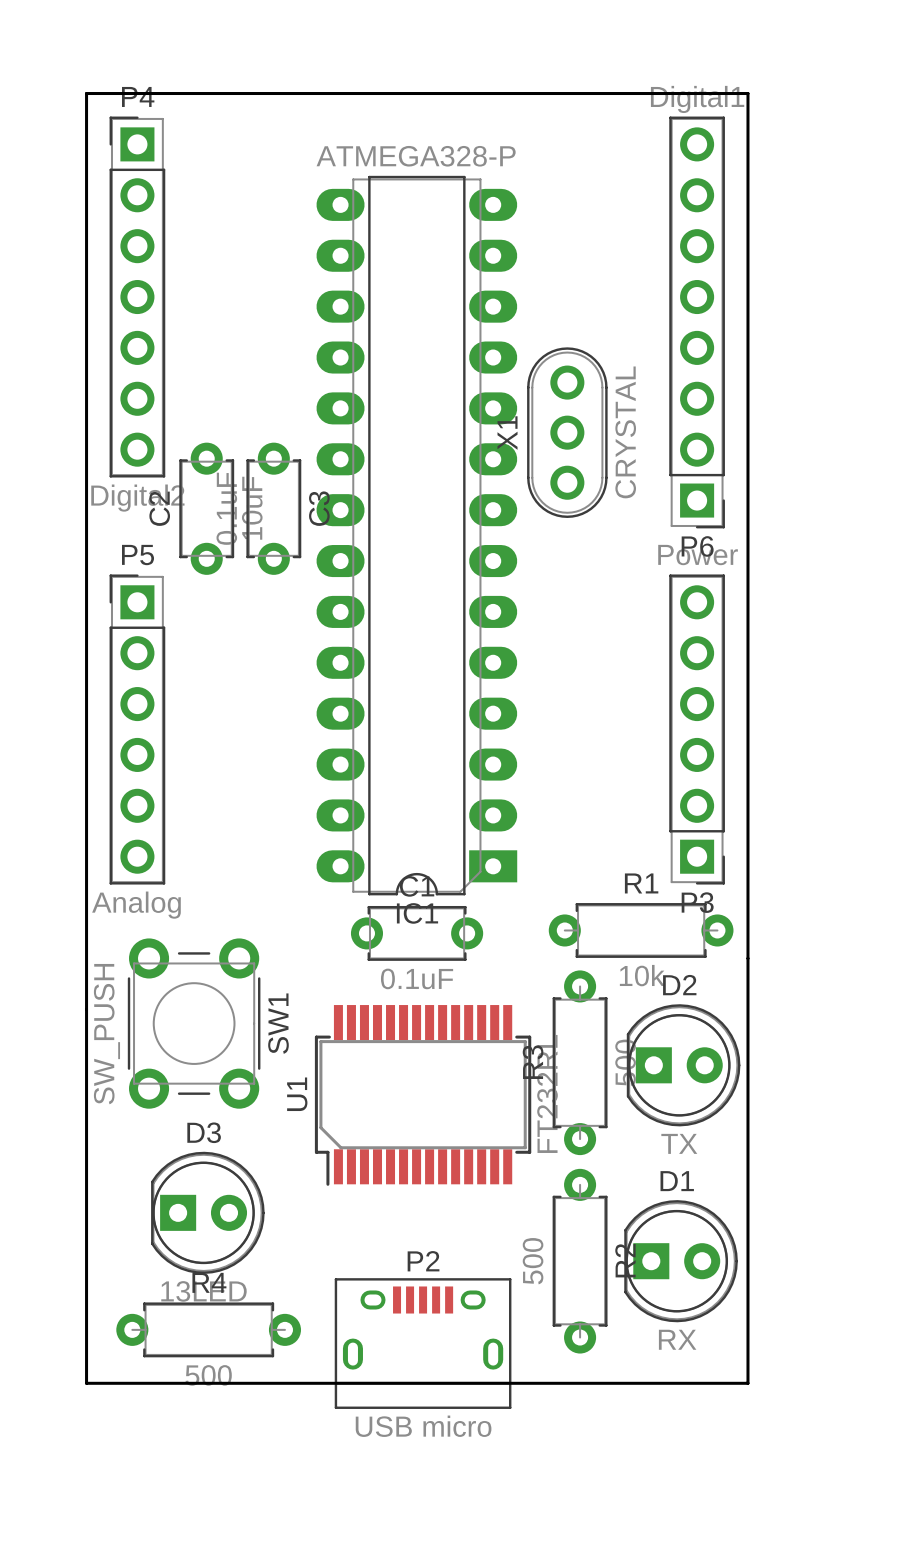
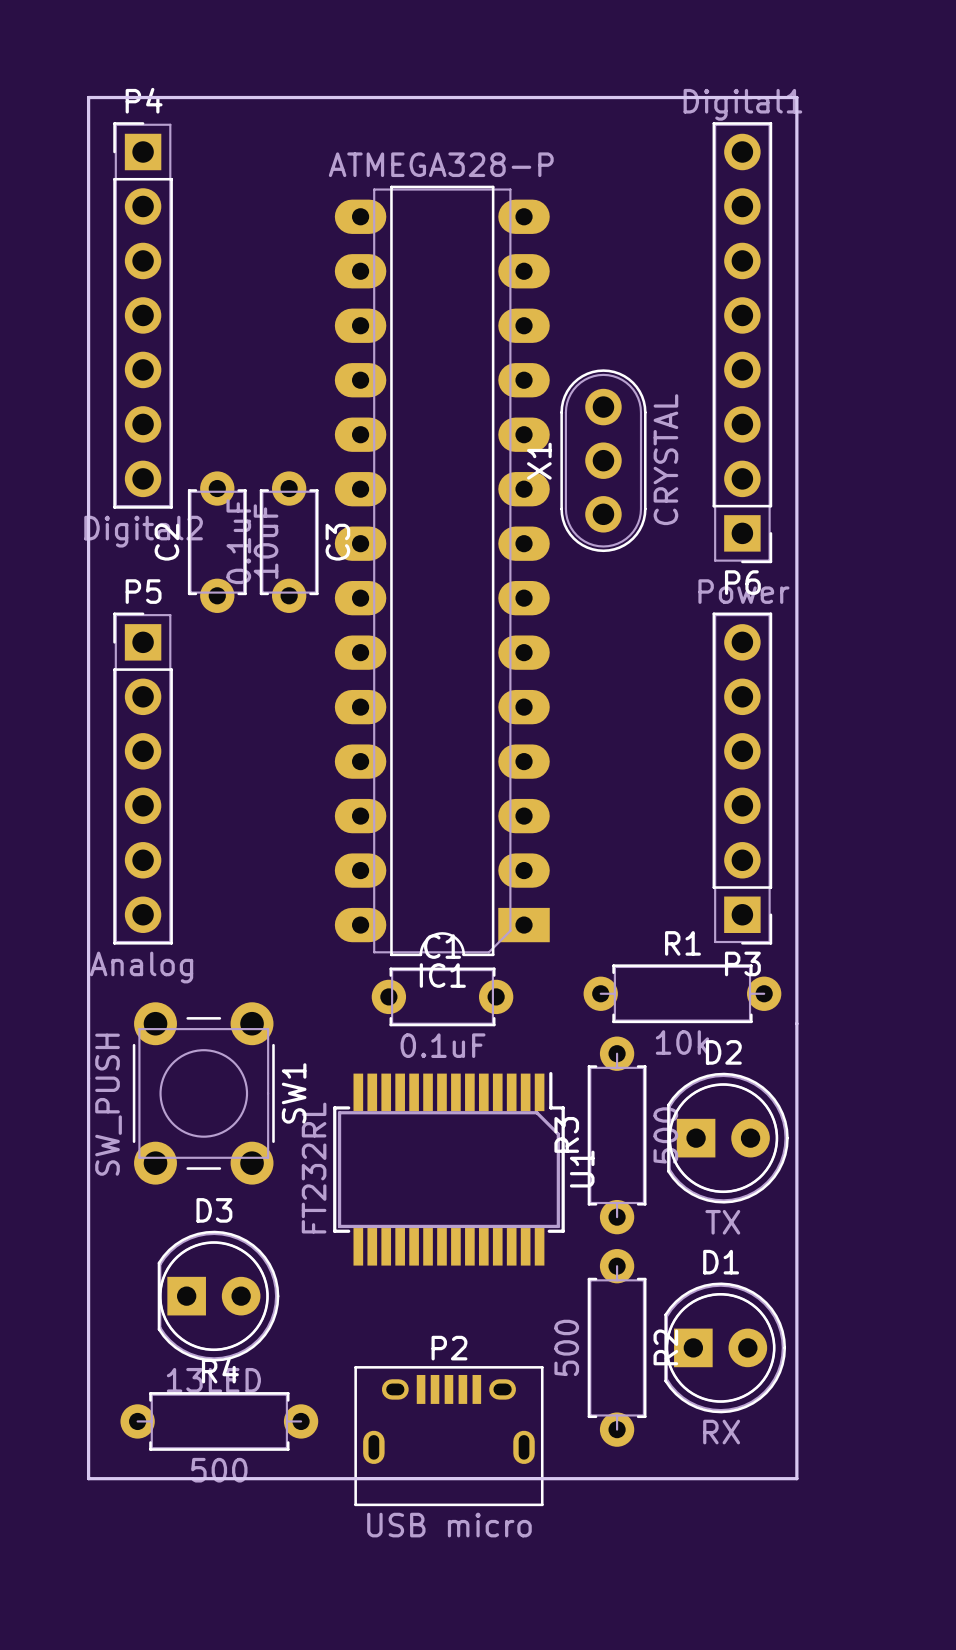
U1 rotation: 0° (423, 1095) -> 180° (448, 1168)

